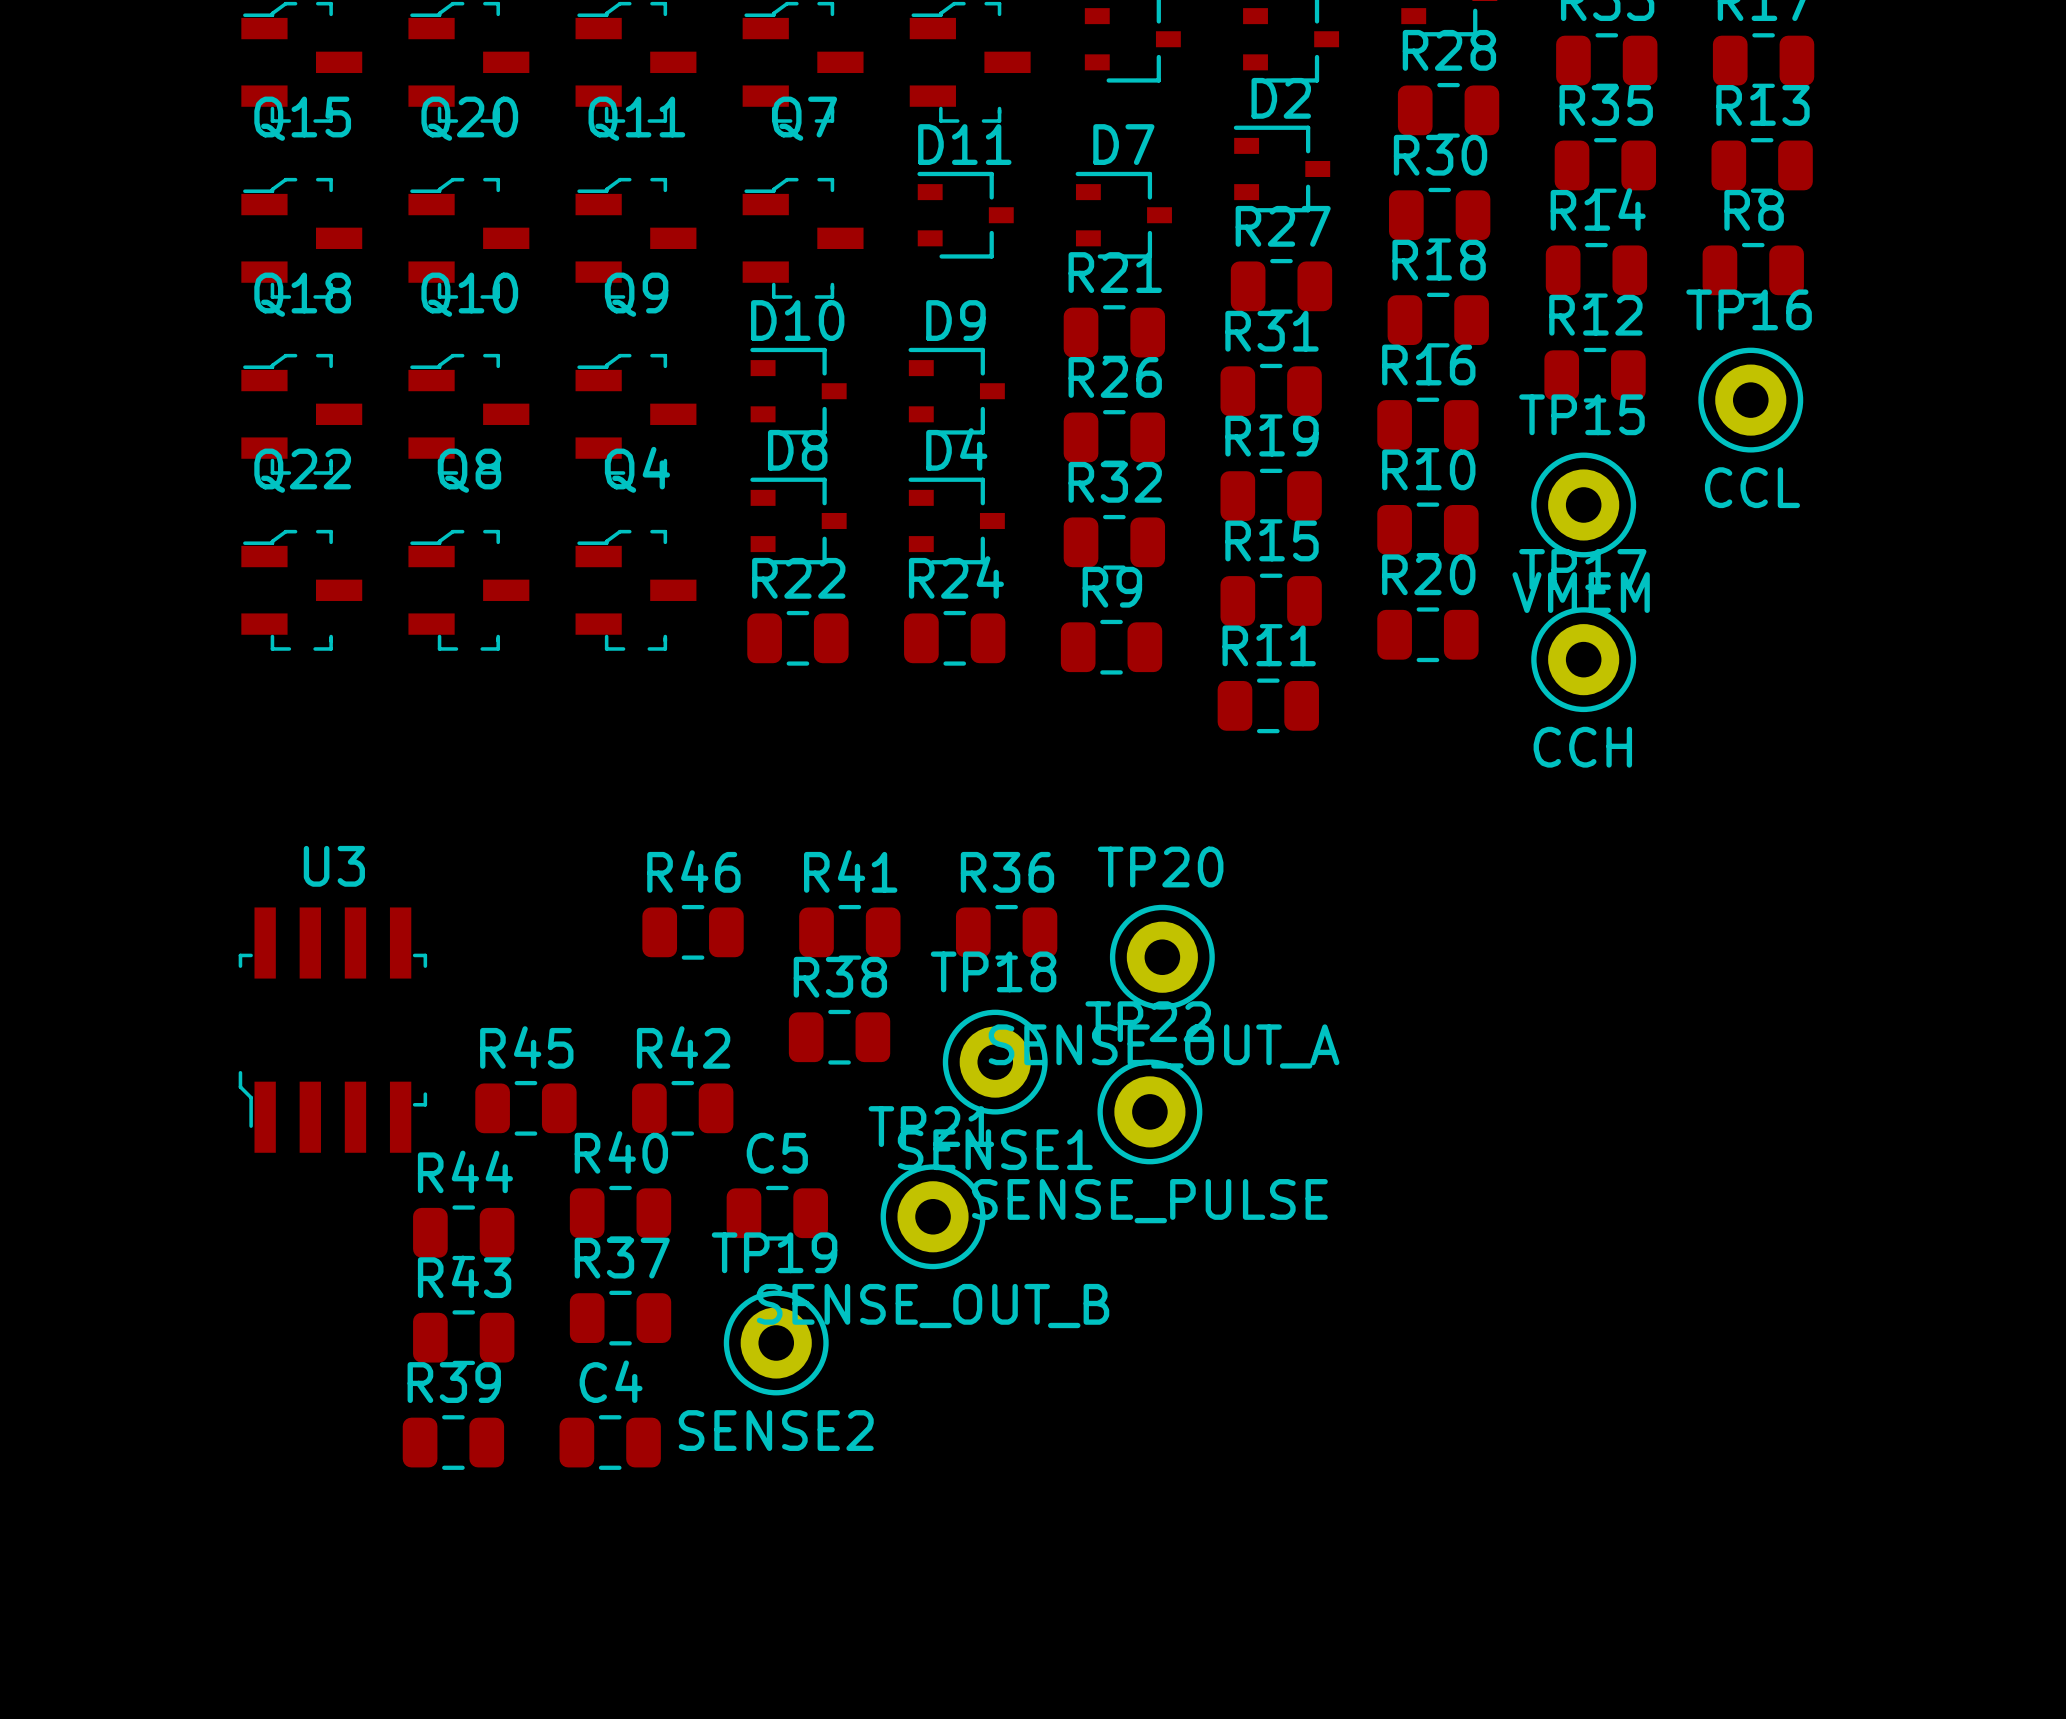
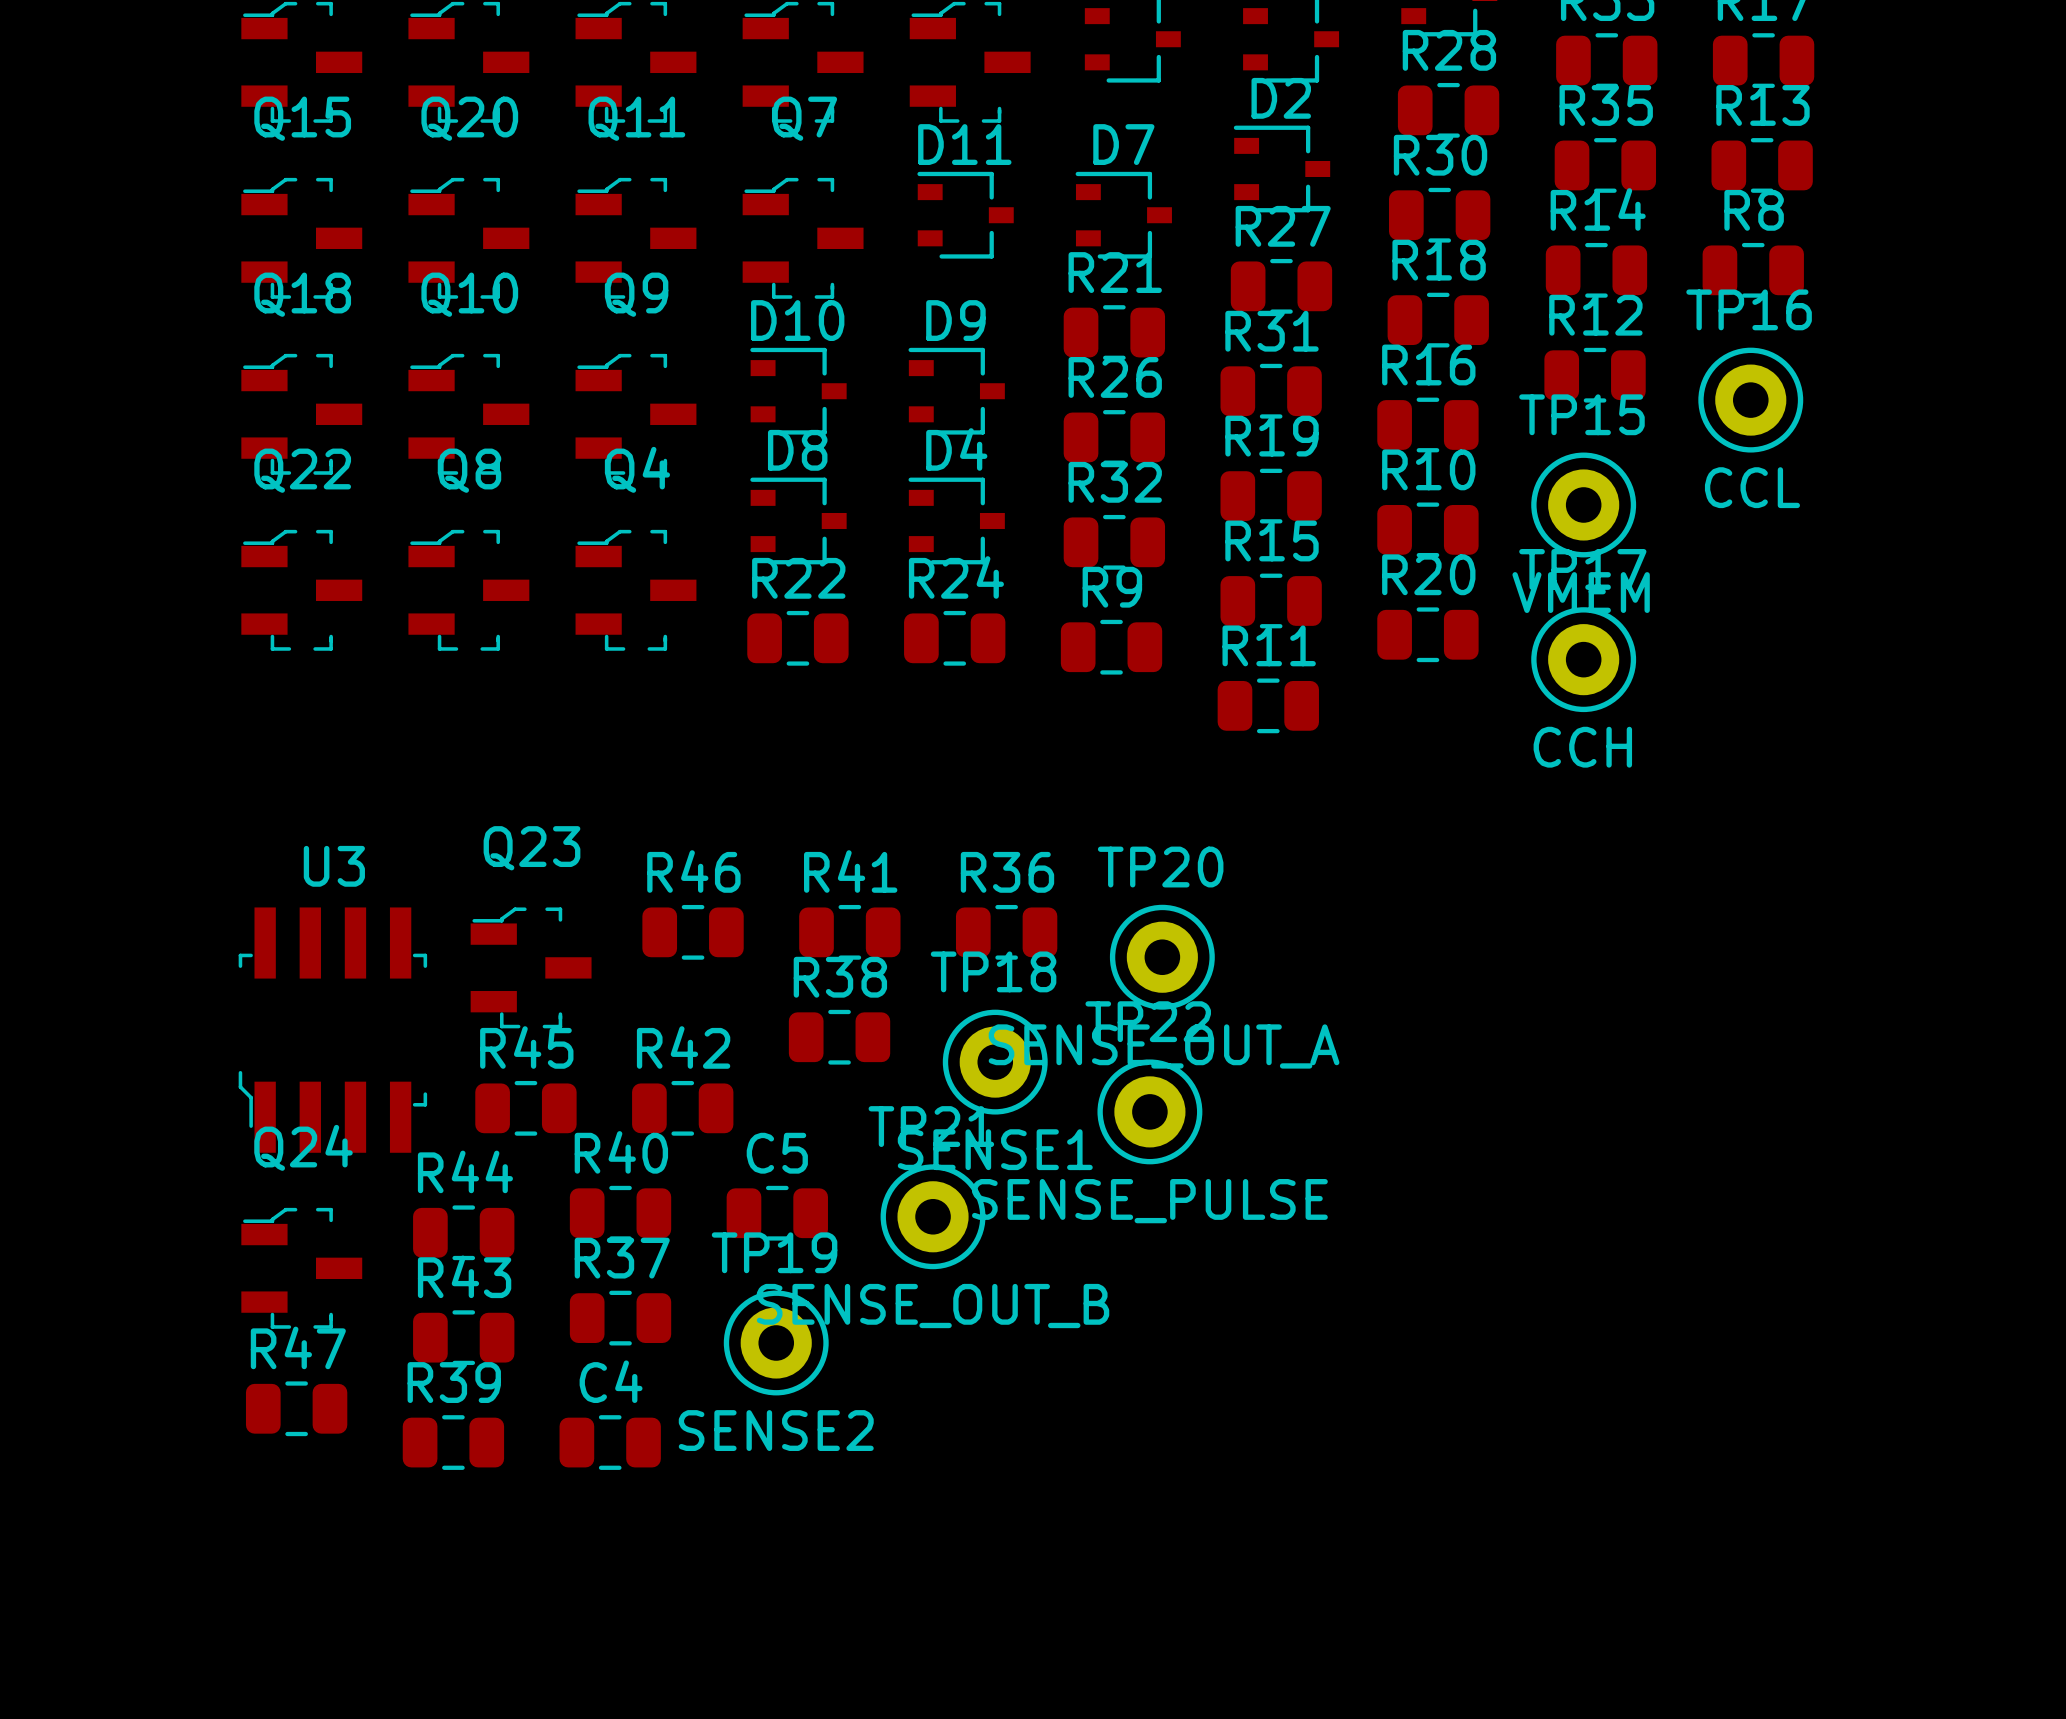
Q23: none -> (531, 967)
Q24: none -> (301, 1268)
R47: none -> (296, 1408)

